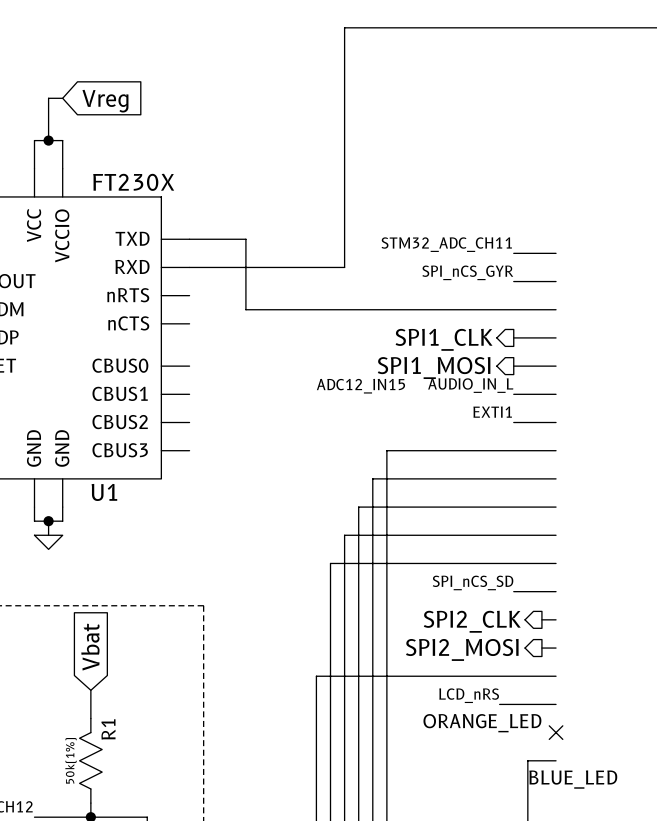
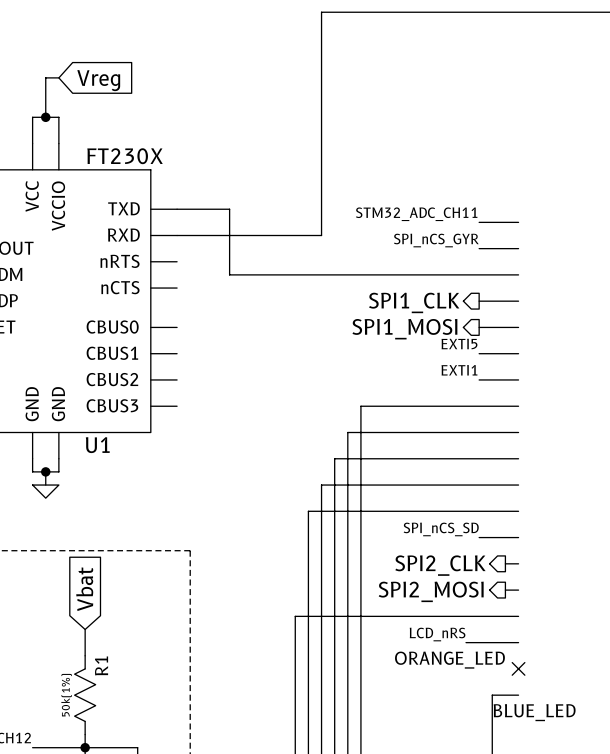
label: AUDIO_IN_L (470, 385) -> EXTI5 (459, 344)
text: ADC12_IN15 (360, 386) -> none

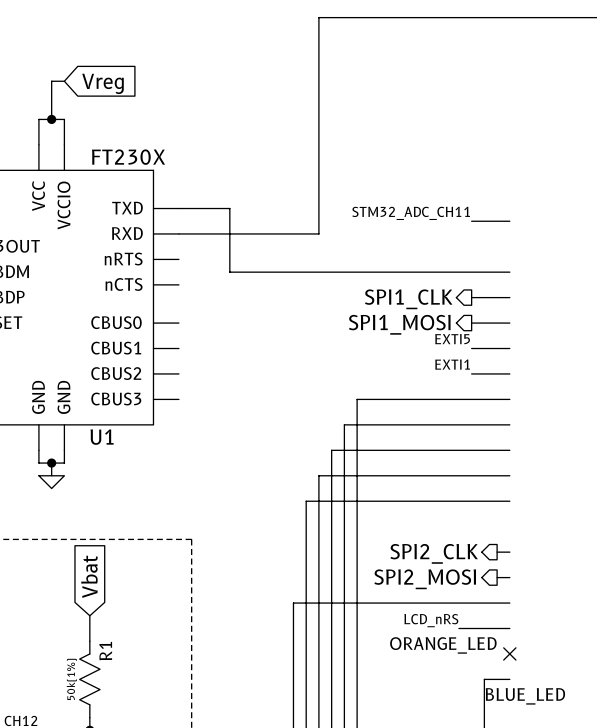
label: SPI_nCS_GYR (436, 240) -> none
wire: (479, 248) (518, 248) -> none
label: SPI_nCS_SD (441, 529) -> none
wire: (479, 537) (518, 537) -> none

